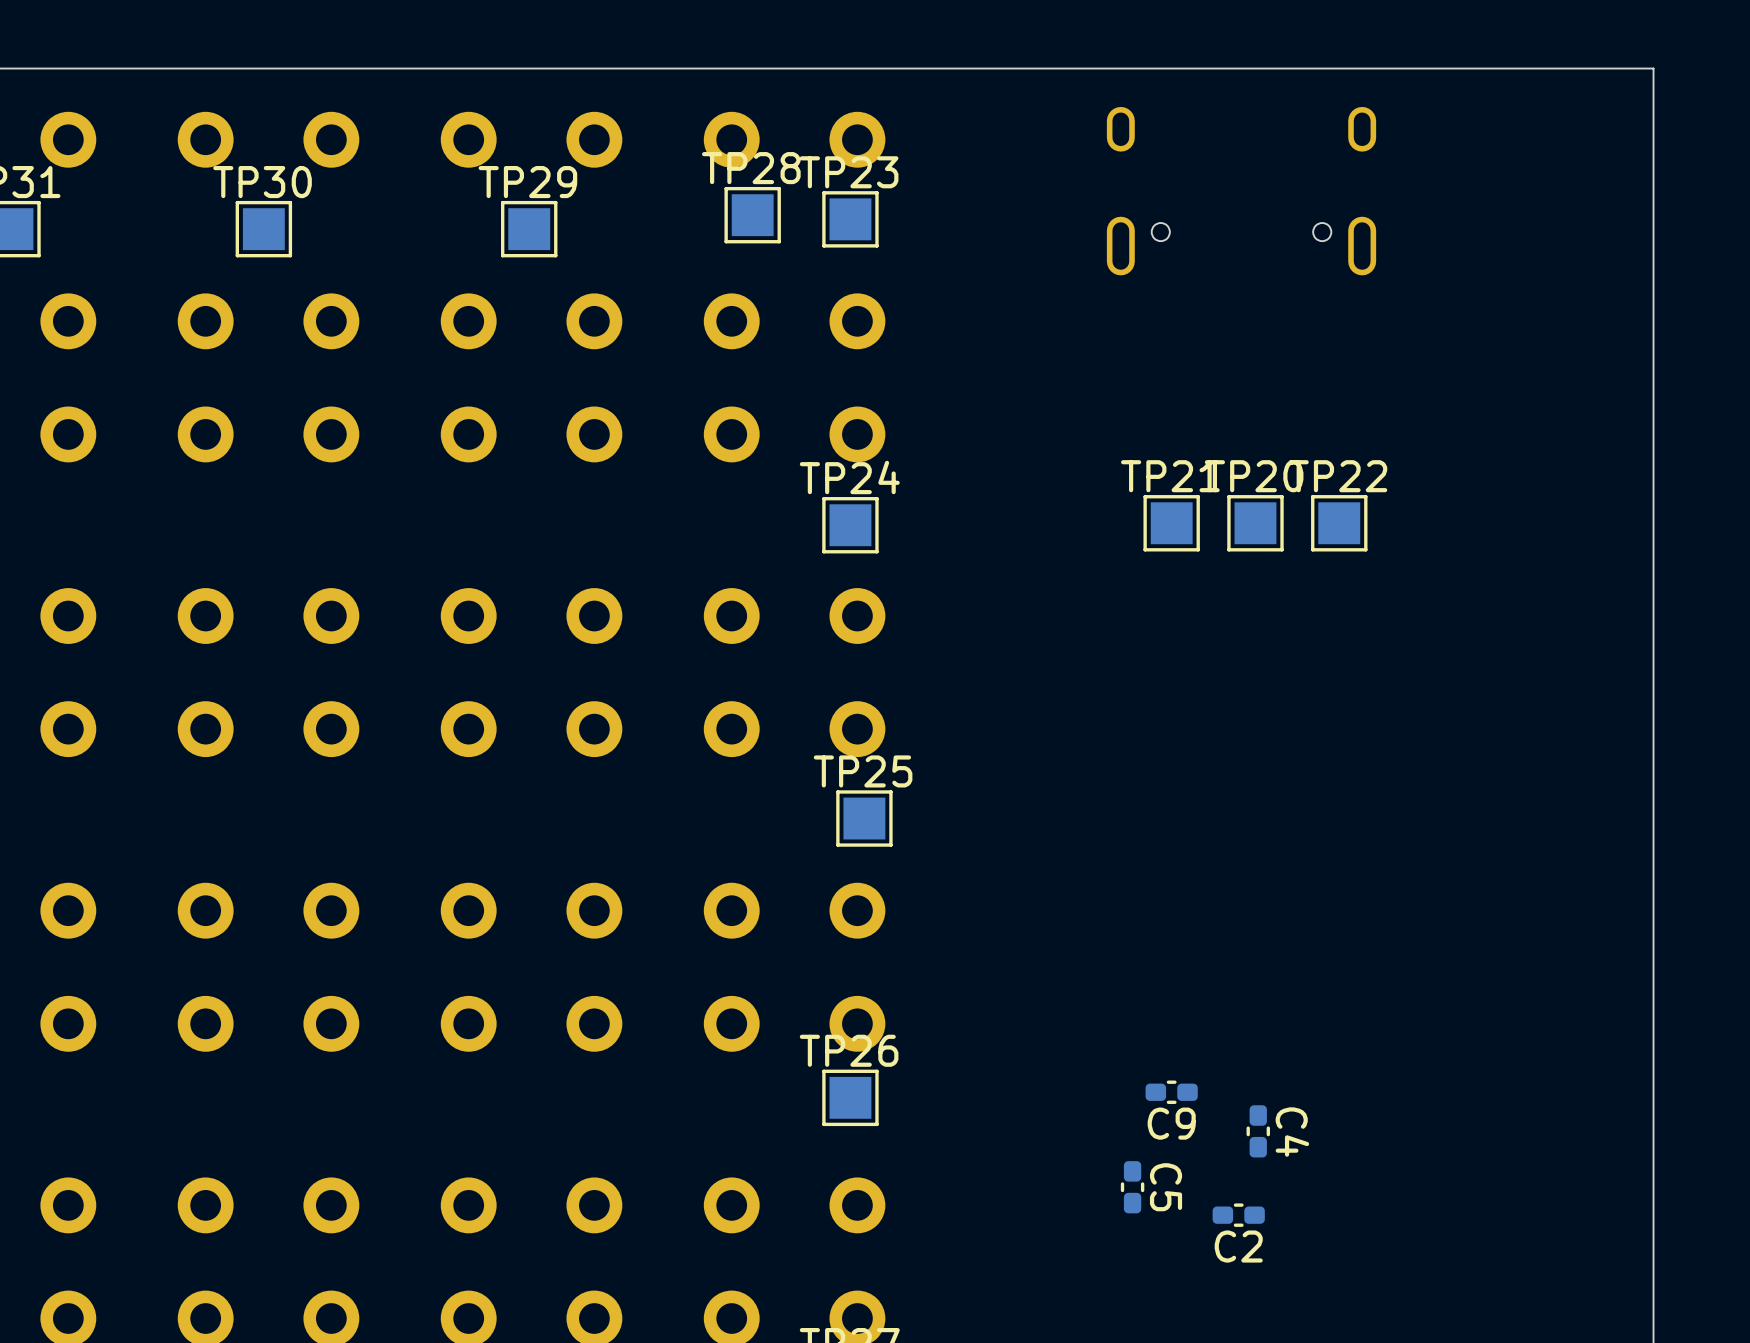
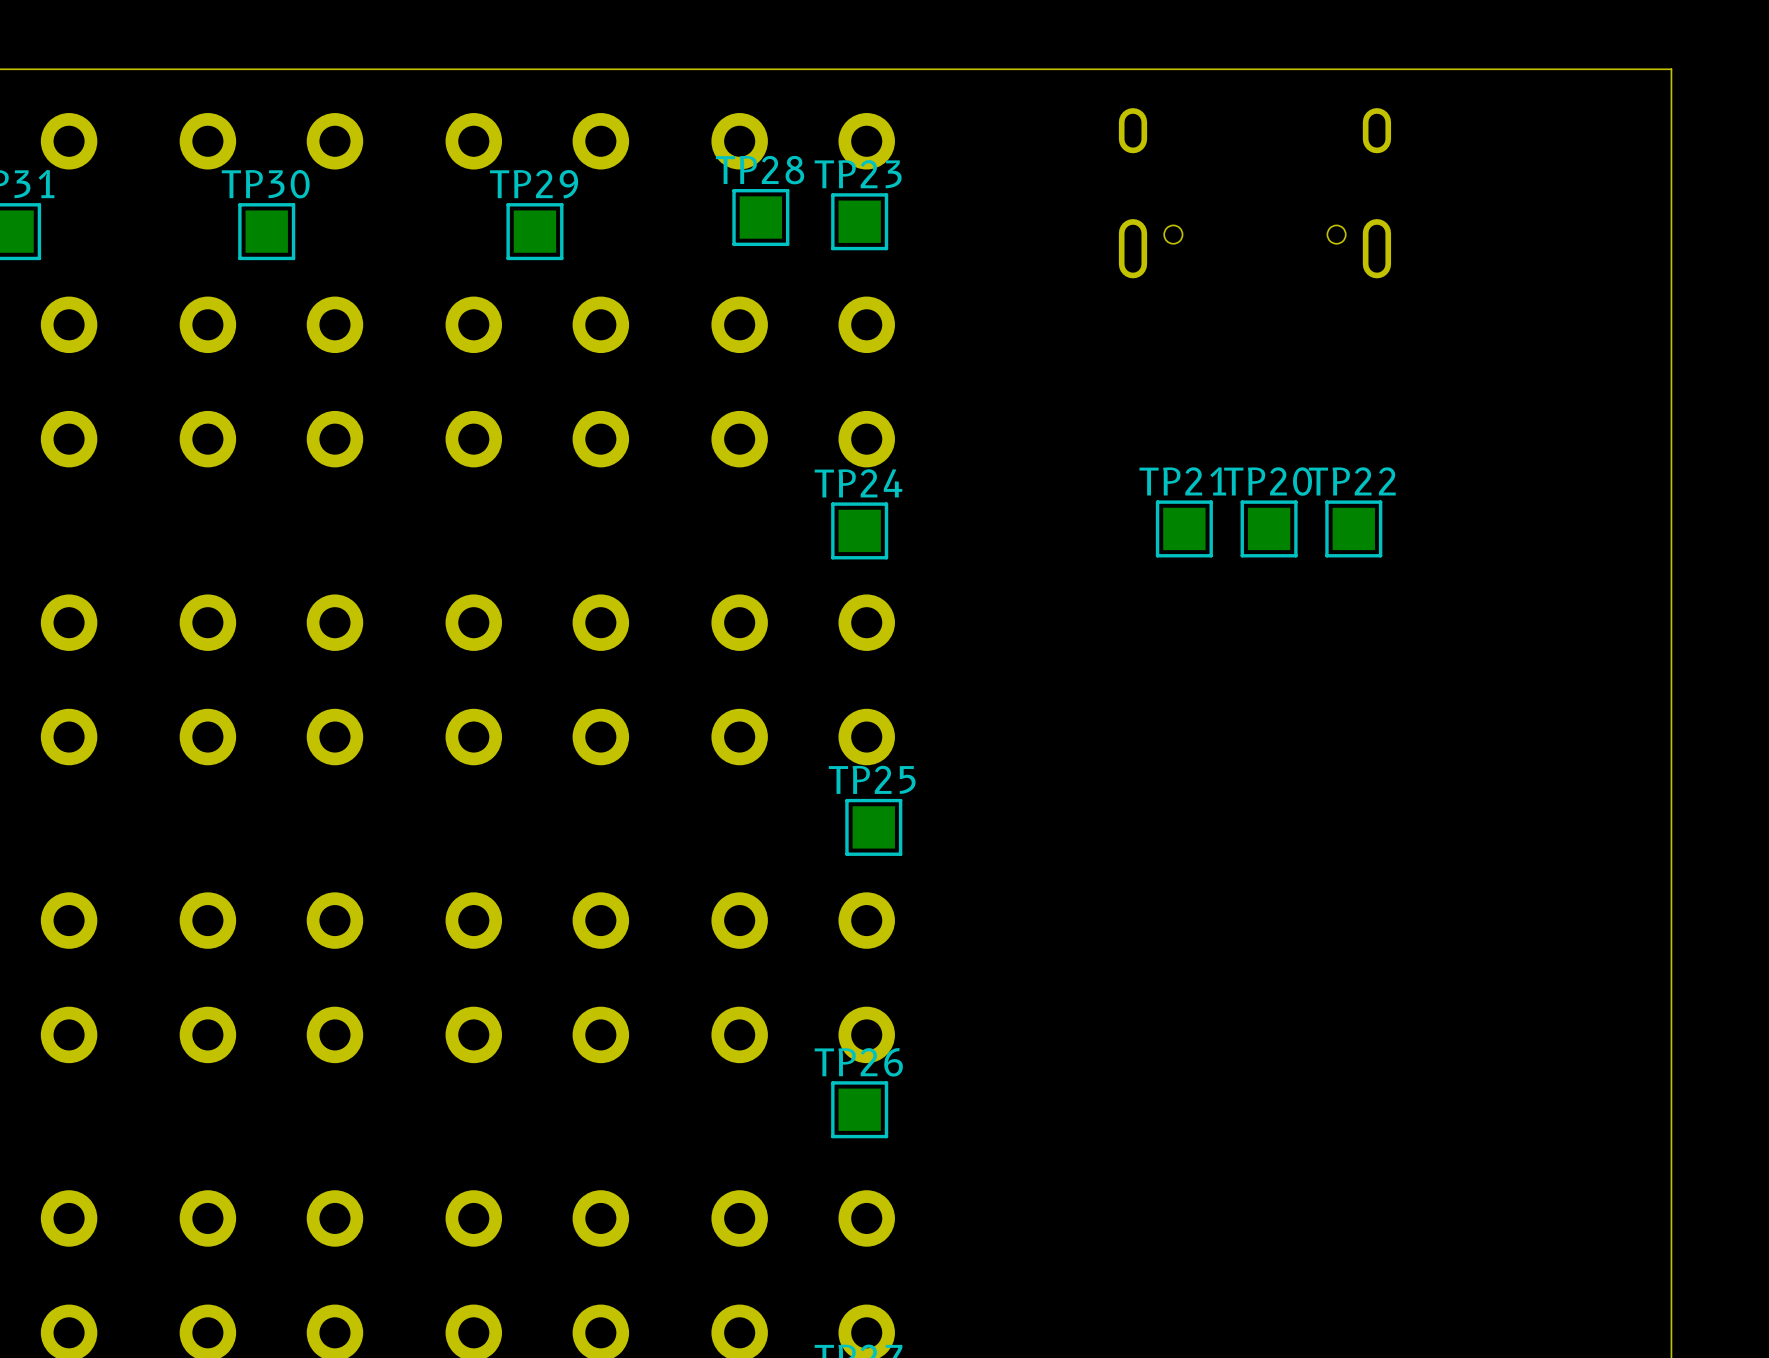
C9: (1171, 1092) -> none
C4: (1258, 1131) -> none
C5: (1132, 1187) -> none
C2: (1238, 1215) -> none

